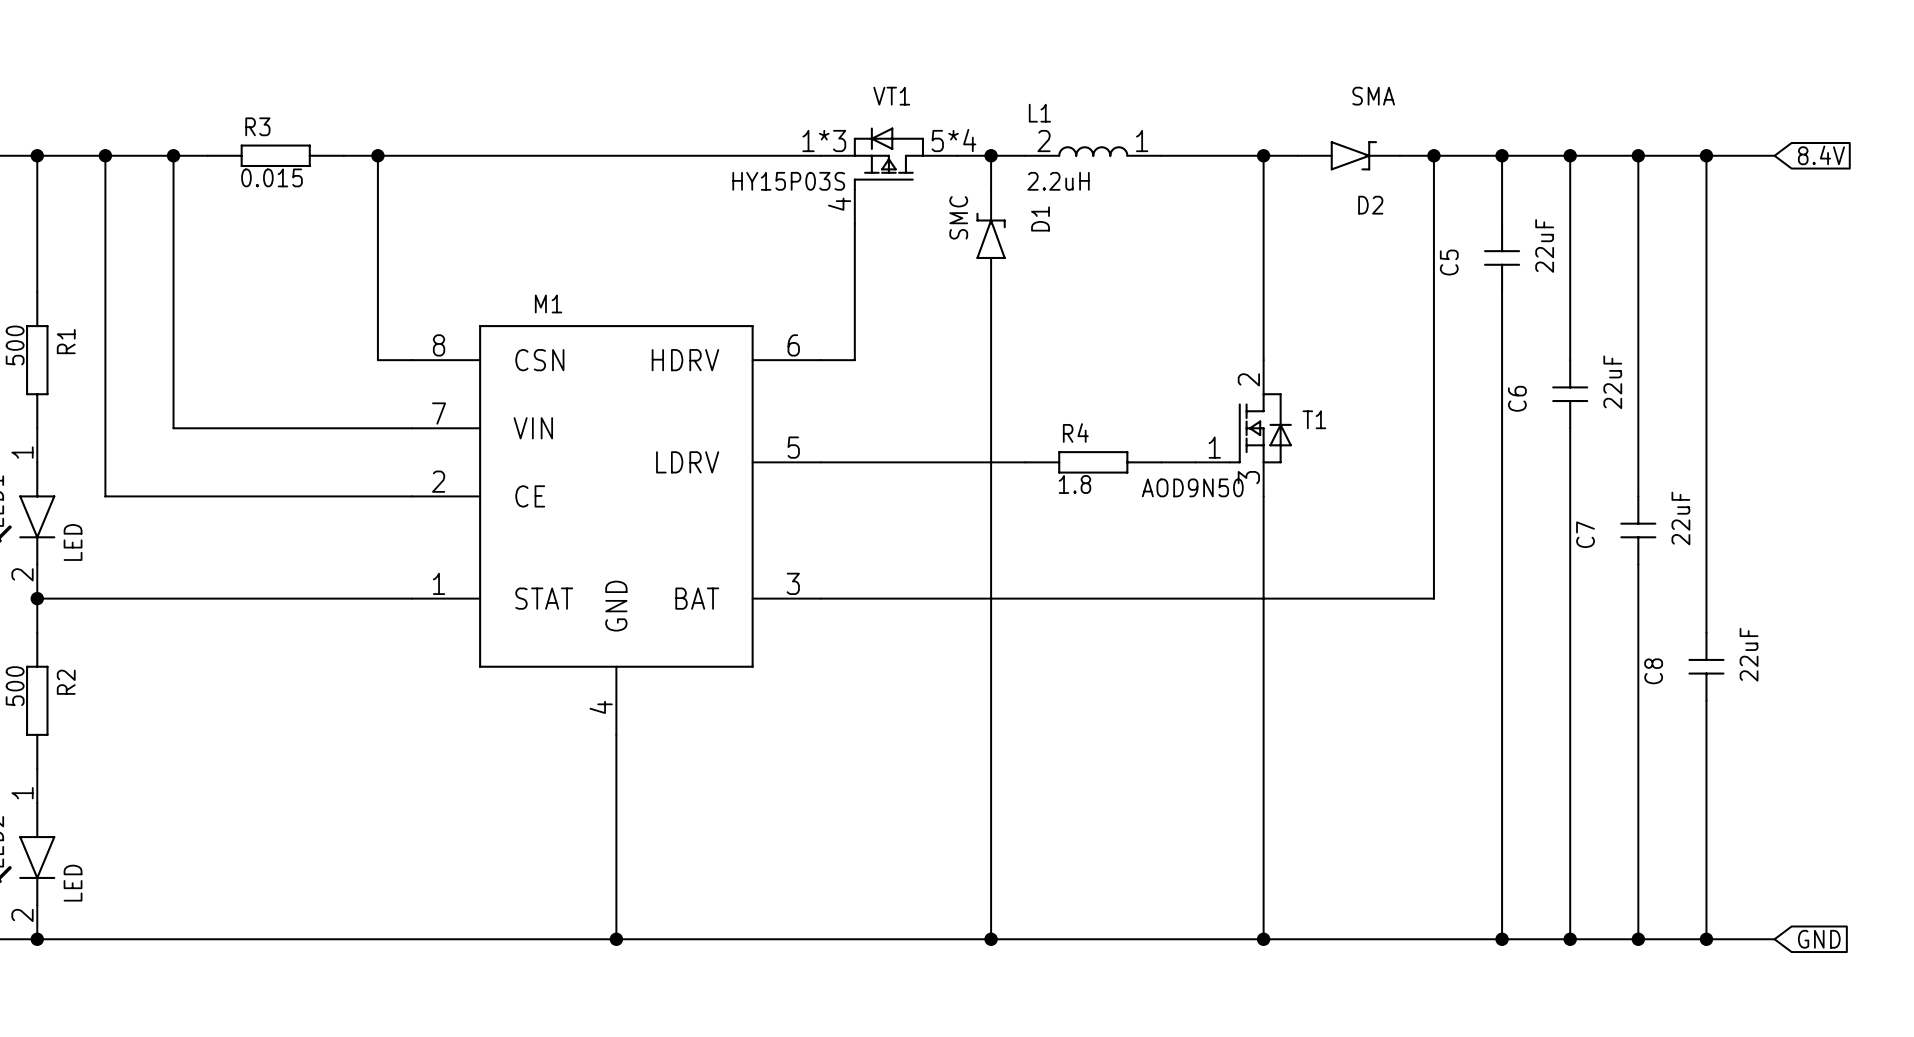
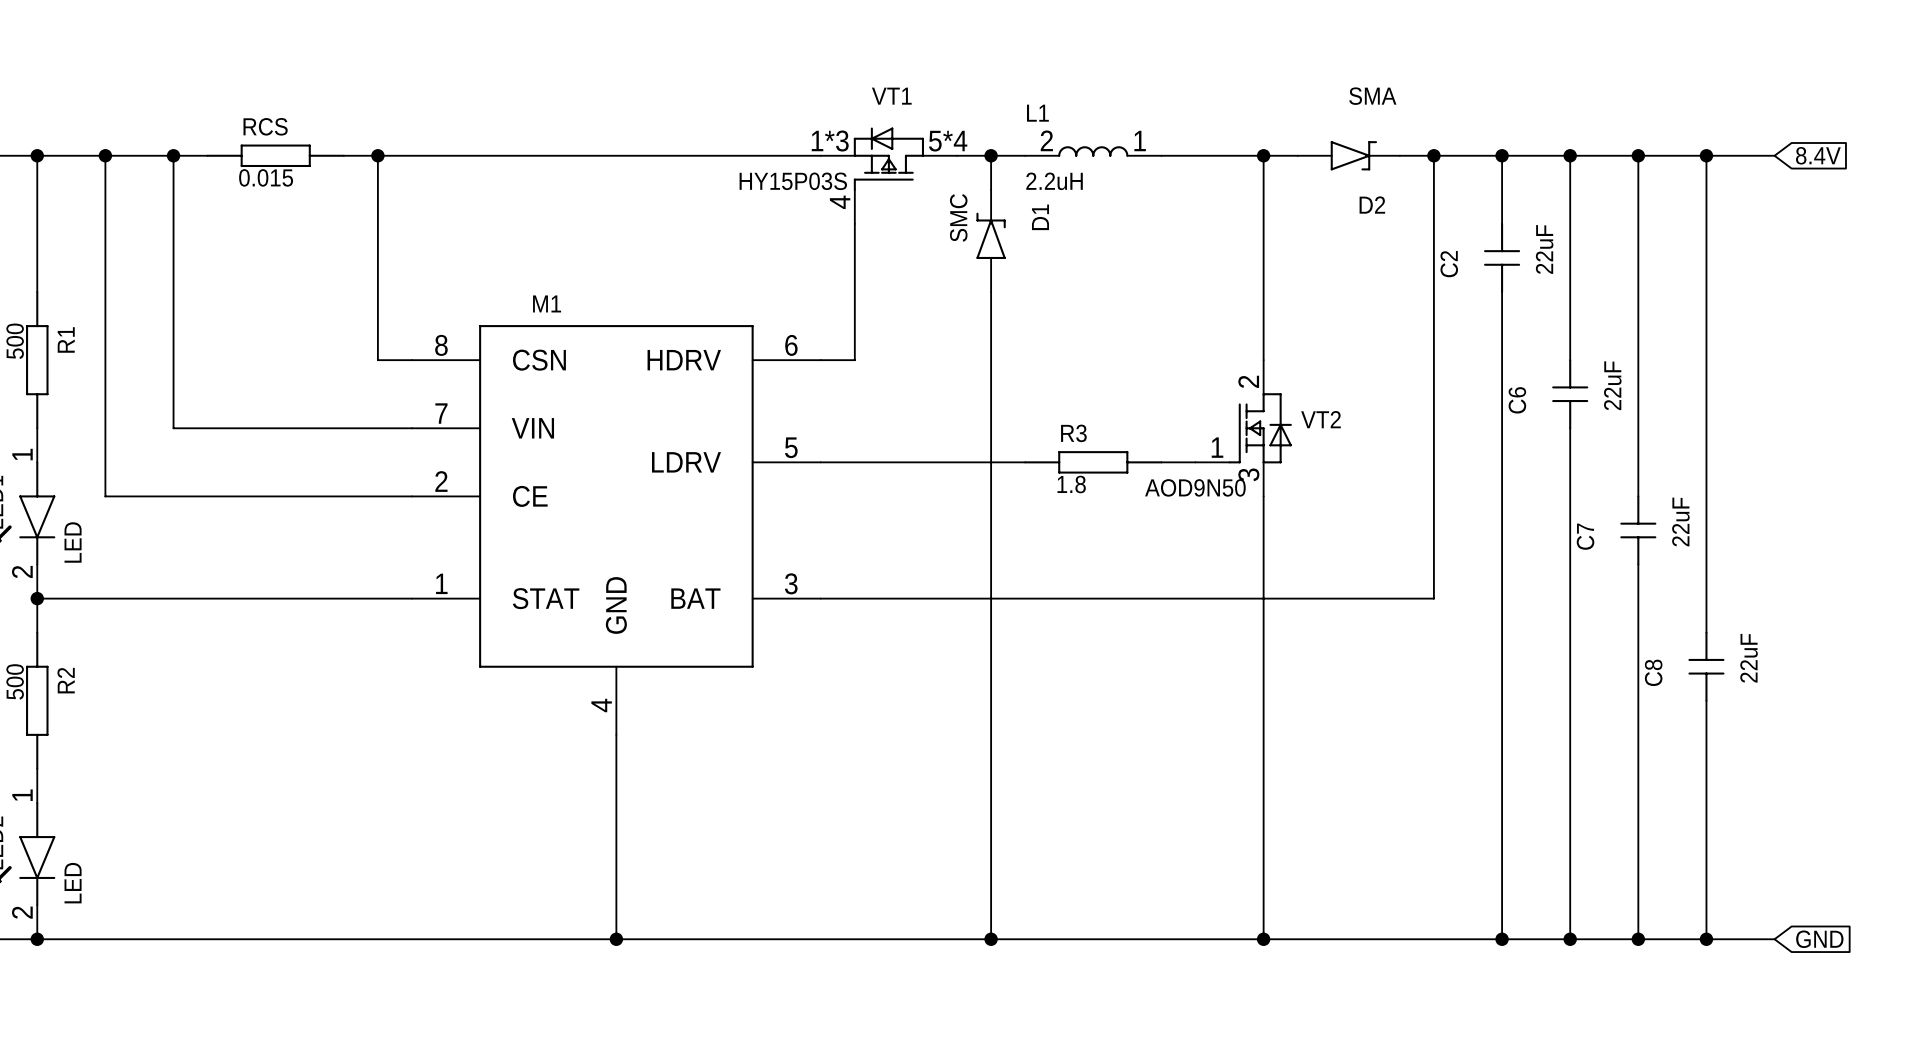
R3 name: R3 (257, 126) -> RCS (265, 126)
C5 name: C5 (1449, 262) -> C2 (1449, 264)
T1 name: T1 (1314, 419) -> VT2 (1321, 419)
R4 name: R4 (1075, 432) -> R3 (1073, 433)

